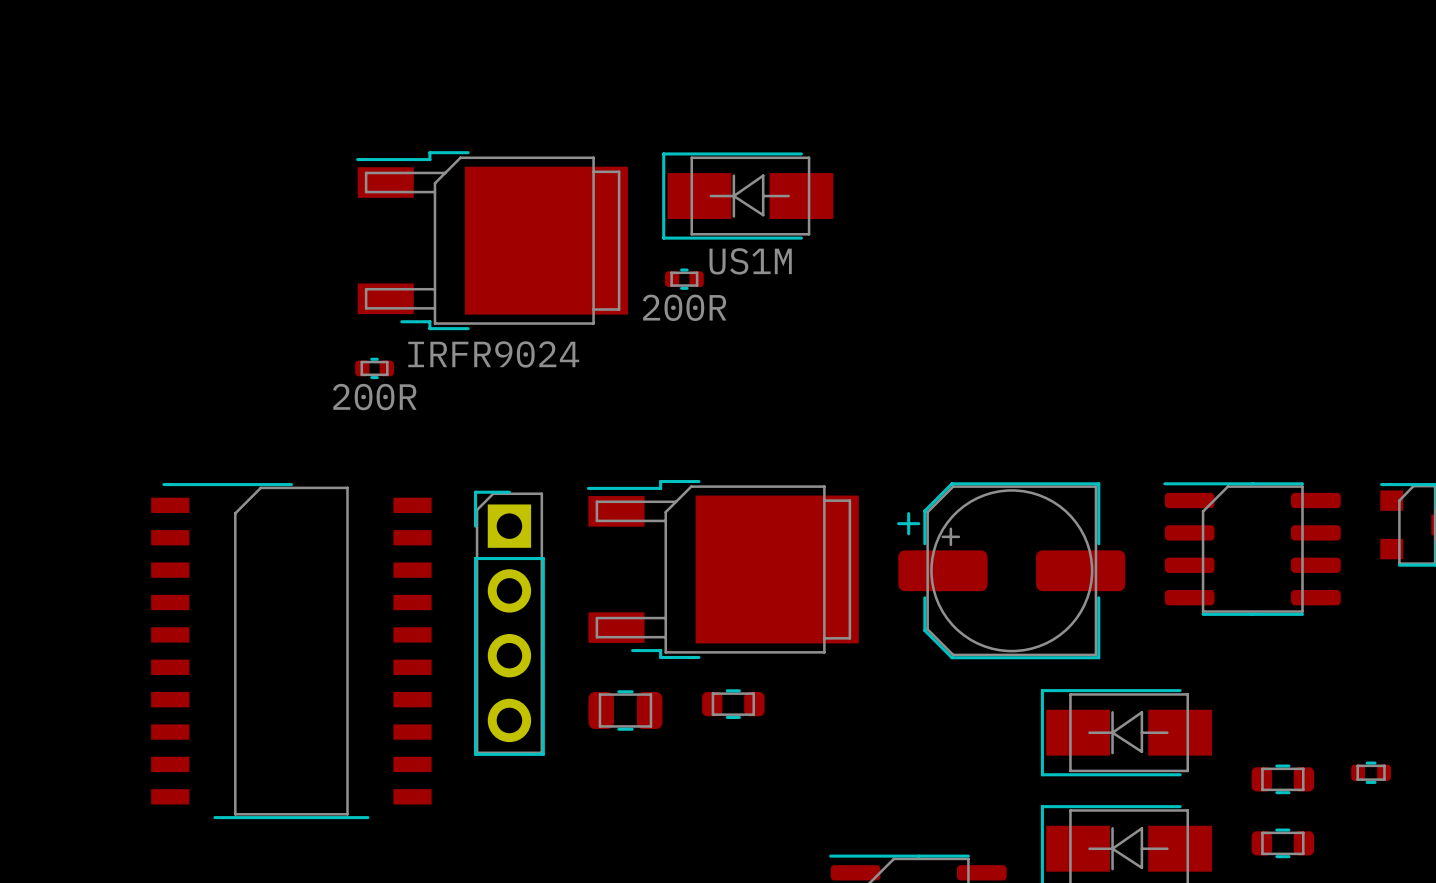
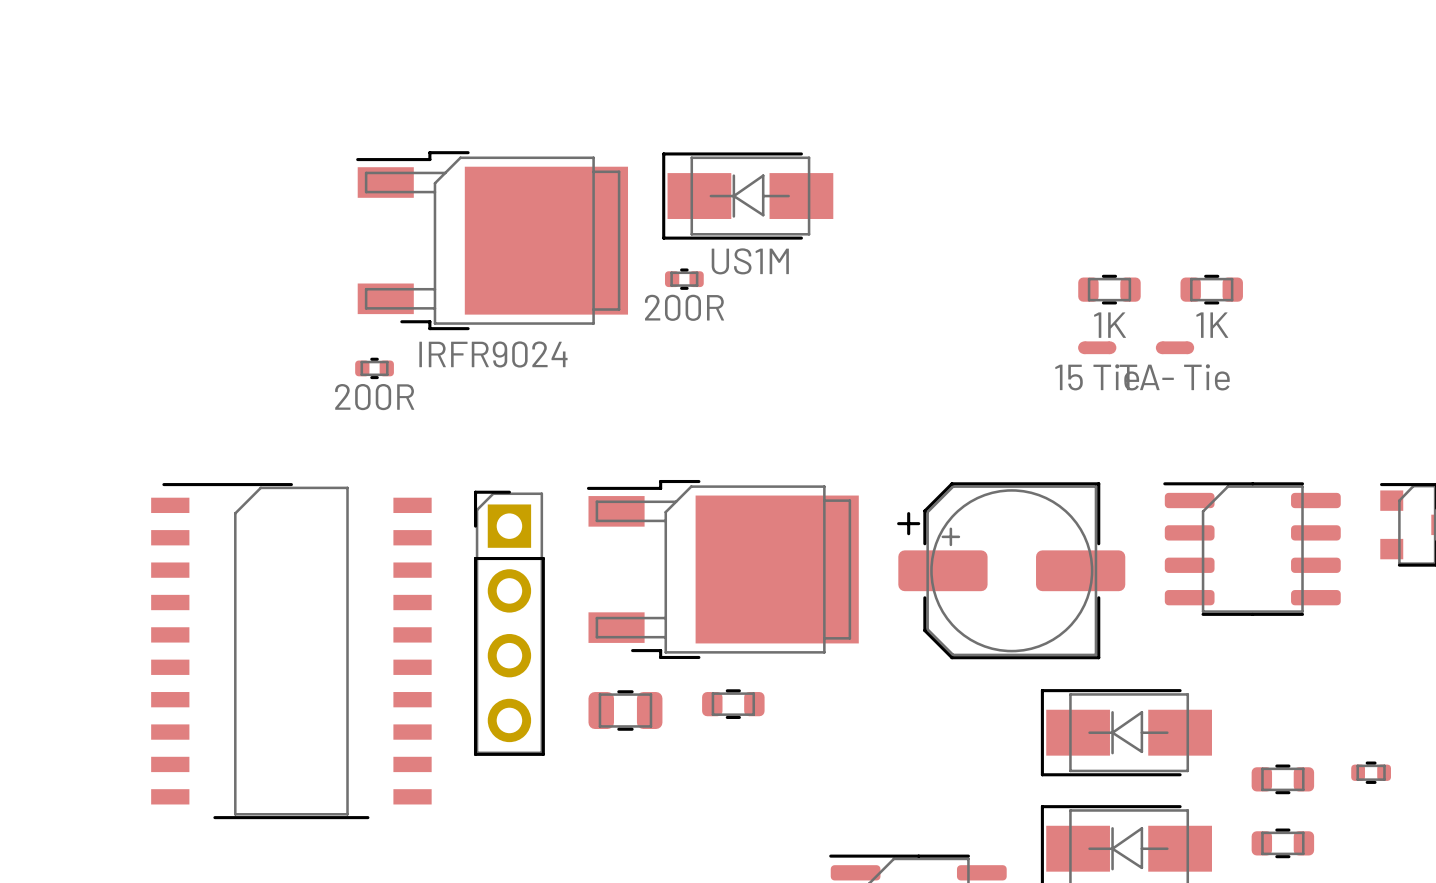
part: none -> 1K (1109, 289)
part: none -> 1K (1211, 289)
part: none -> 15 Tie (1097, 347)
part: none -> TA- Tie (1175, 347)

